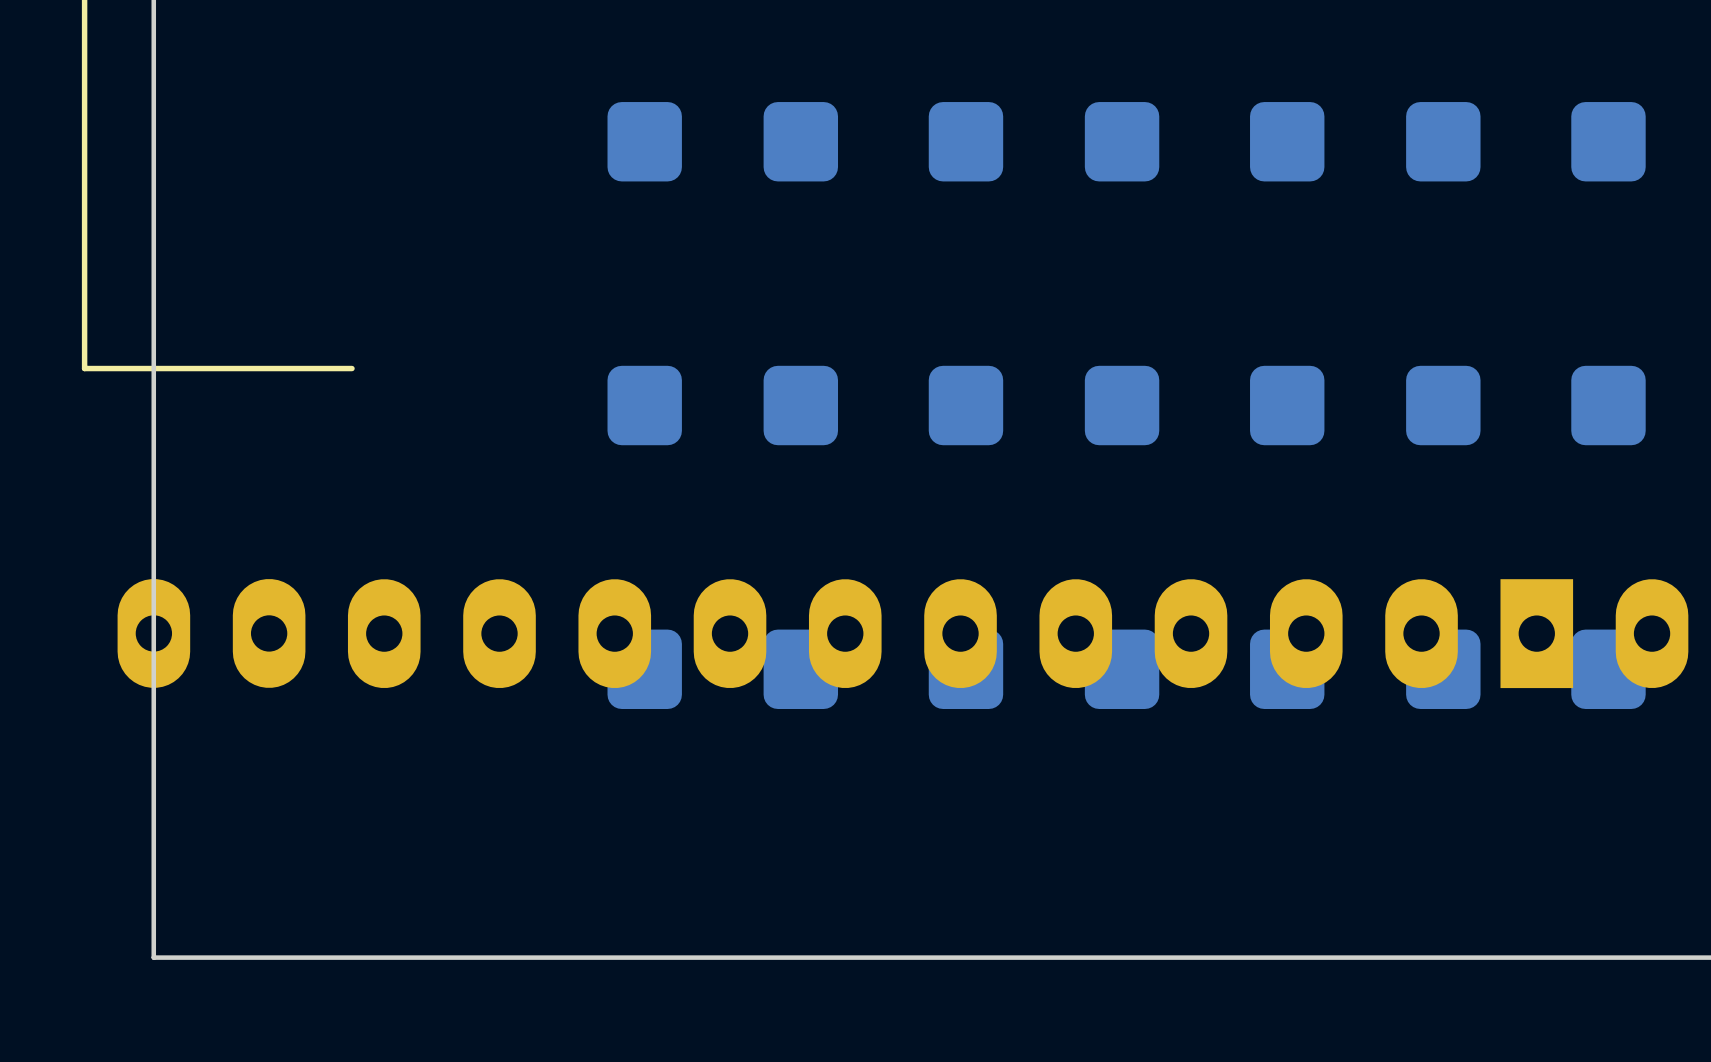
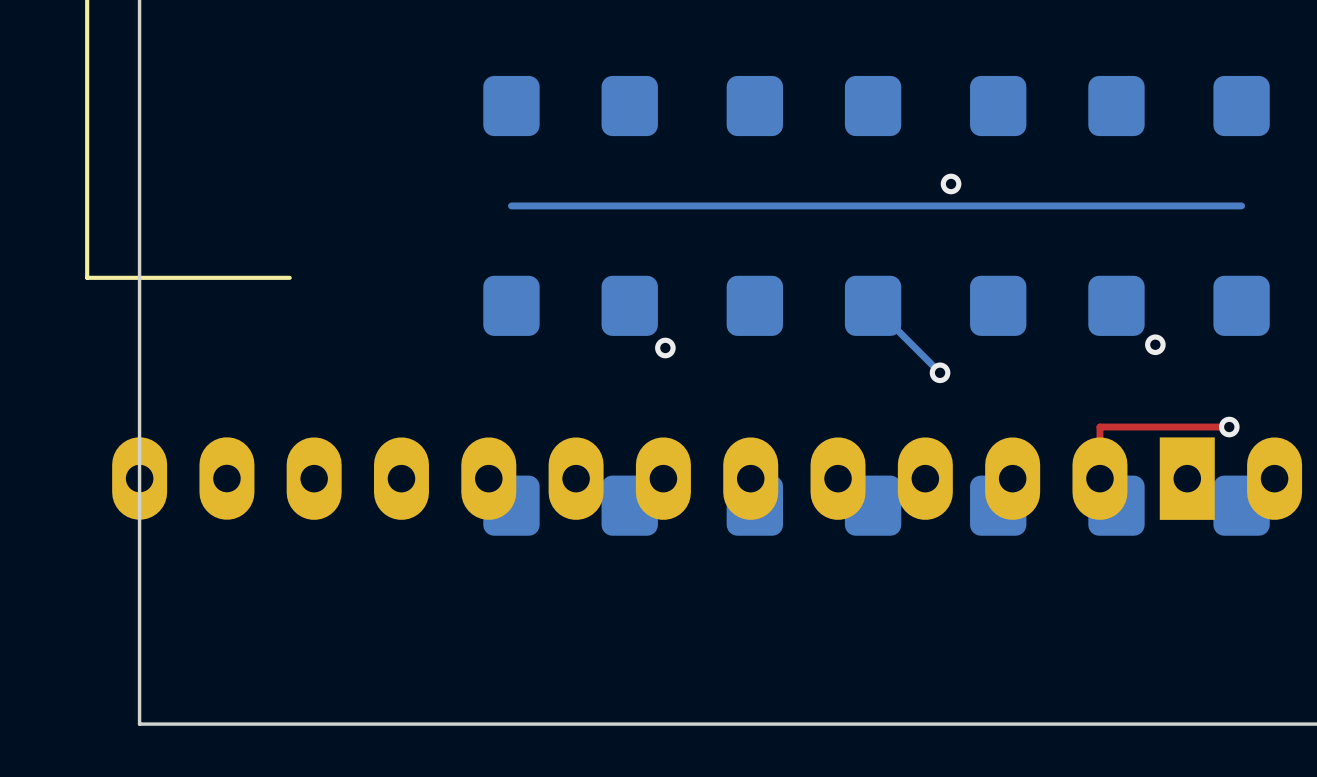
via: none -> (951, 183)
bottom track: none -> (511, 205) (1241, 205)
bottom track: none -> (873, 305) (940, 372)
via: none -> (1155, 344)
via: none -> (665, 348)
via: none -> (940, 372)
top track: none -> (1229, 427) (1099, 427) (1099, 478)
via: none -> (1229, 427)

